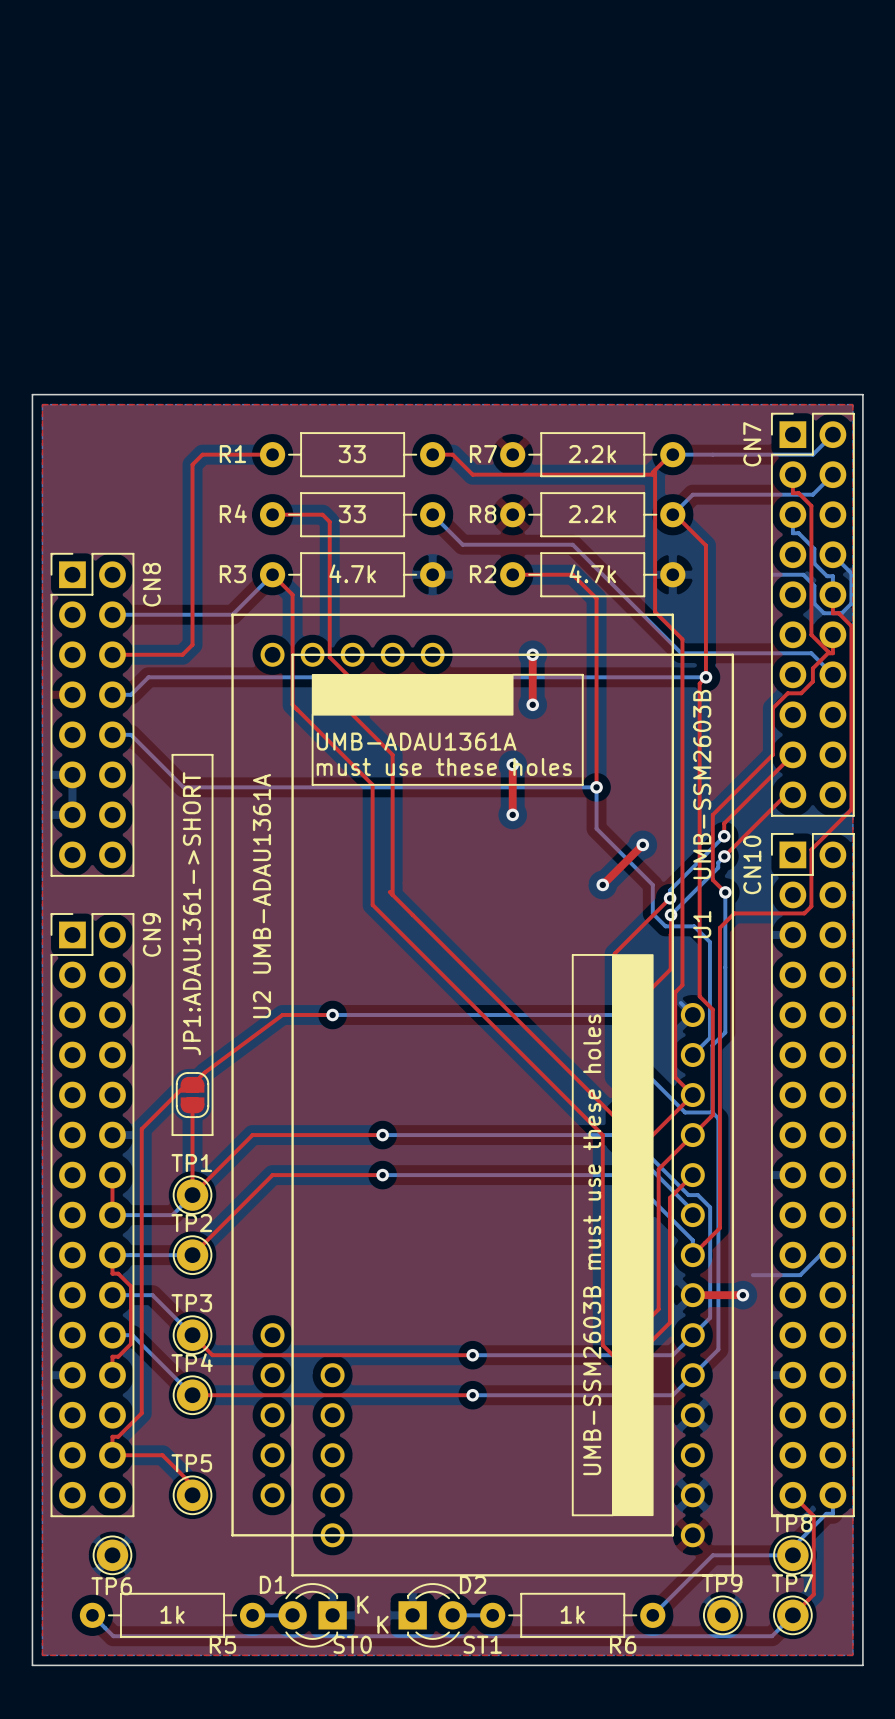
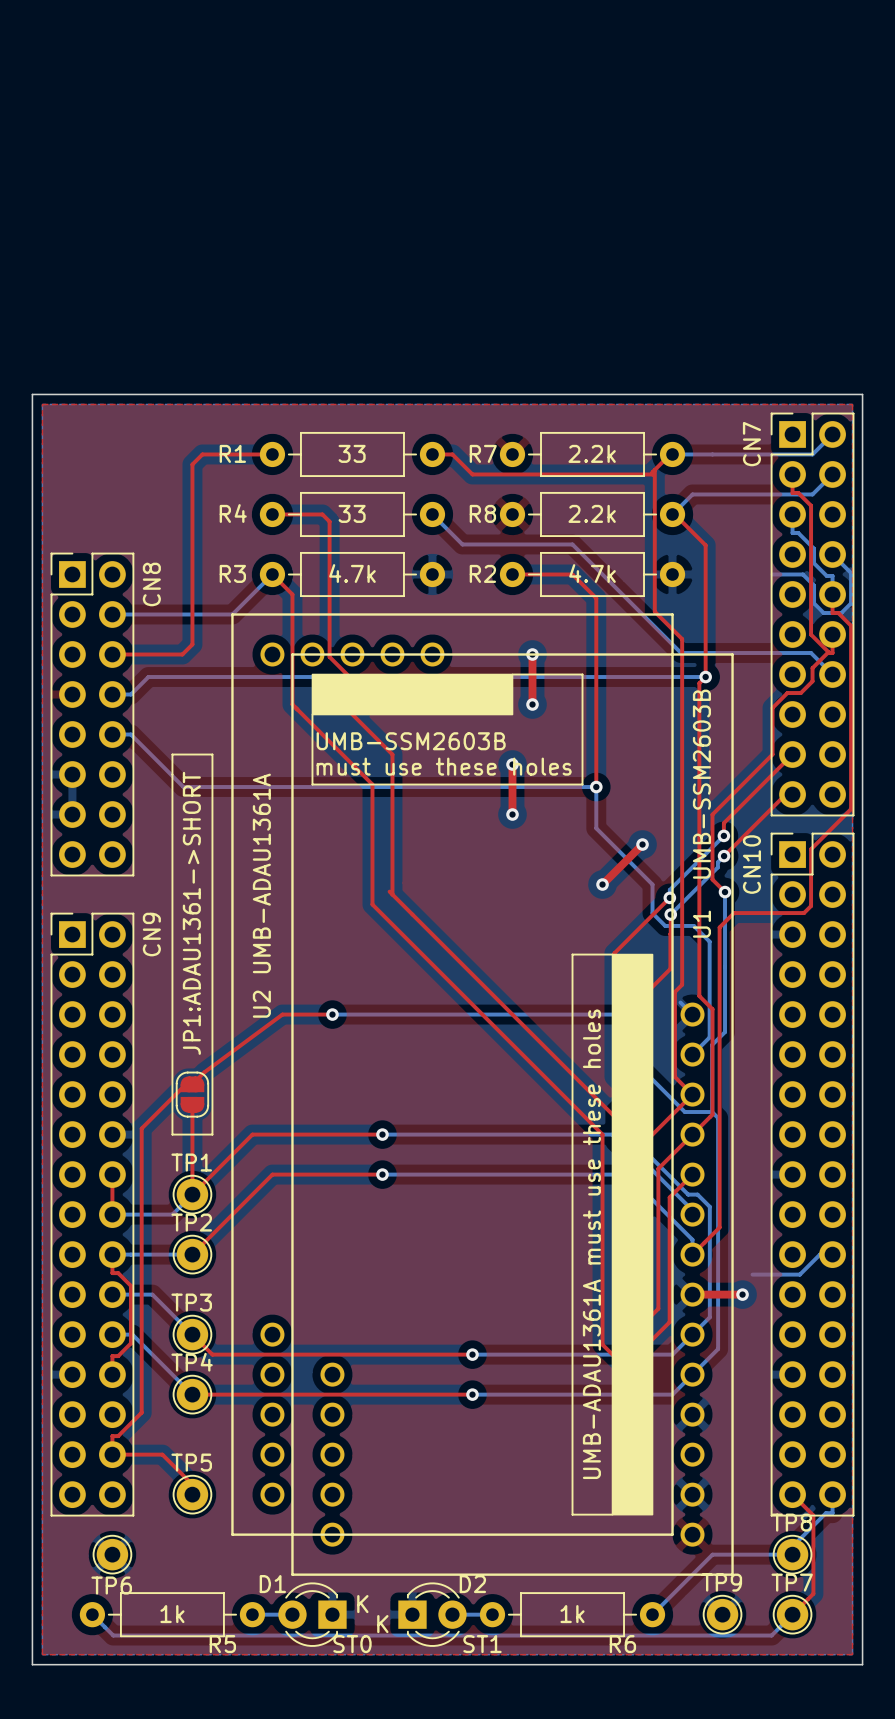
text: UMB-ADAU1361A (416, 741) -> UMB-SSM2603B (411, 741)
text: UMB-SSM2603B must use these holes (592, 1244) -> UMB-ADAU1361A must use these holes (591, 1244)

